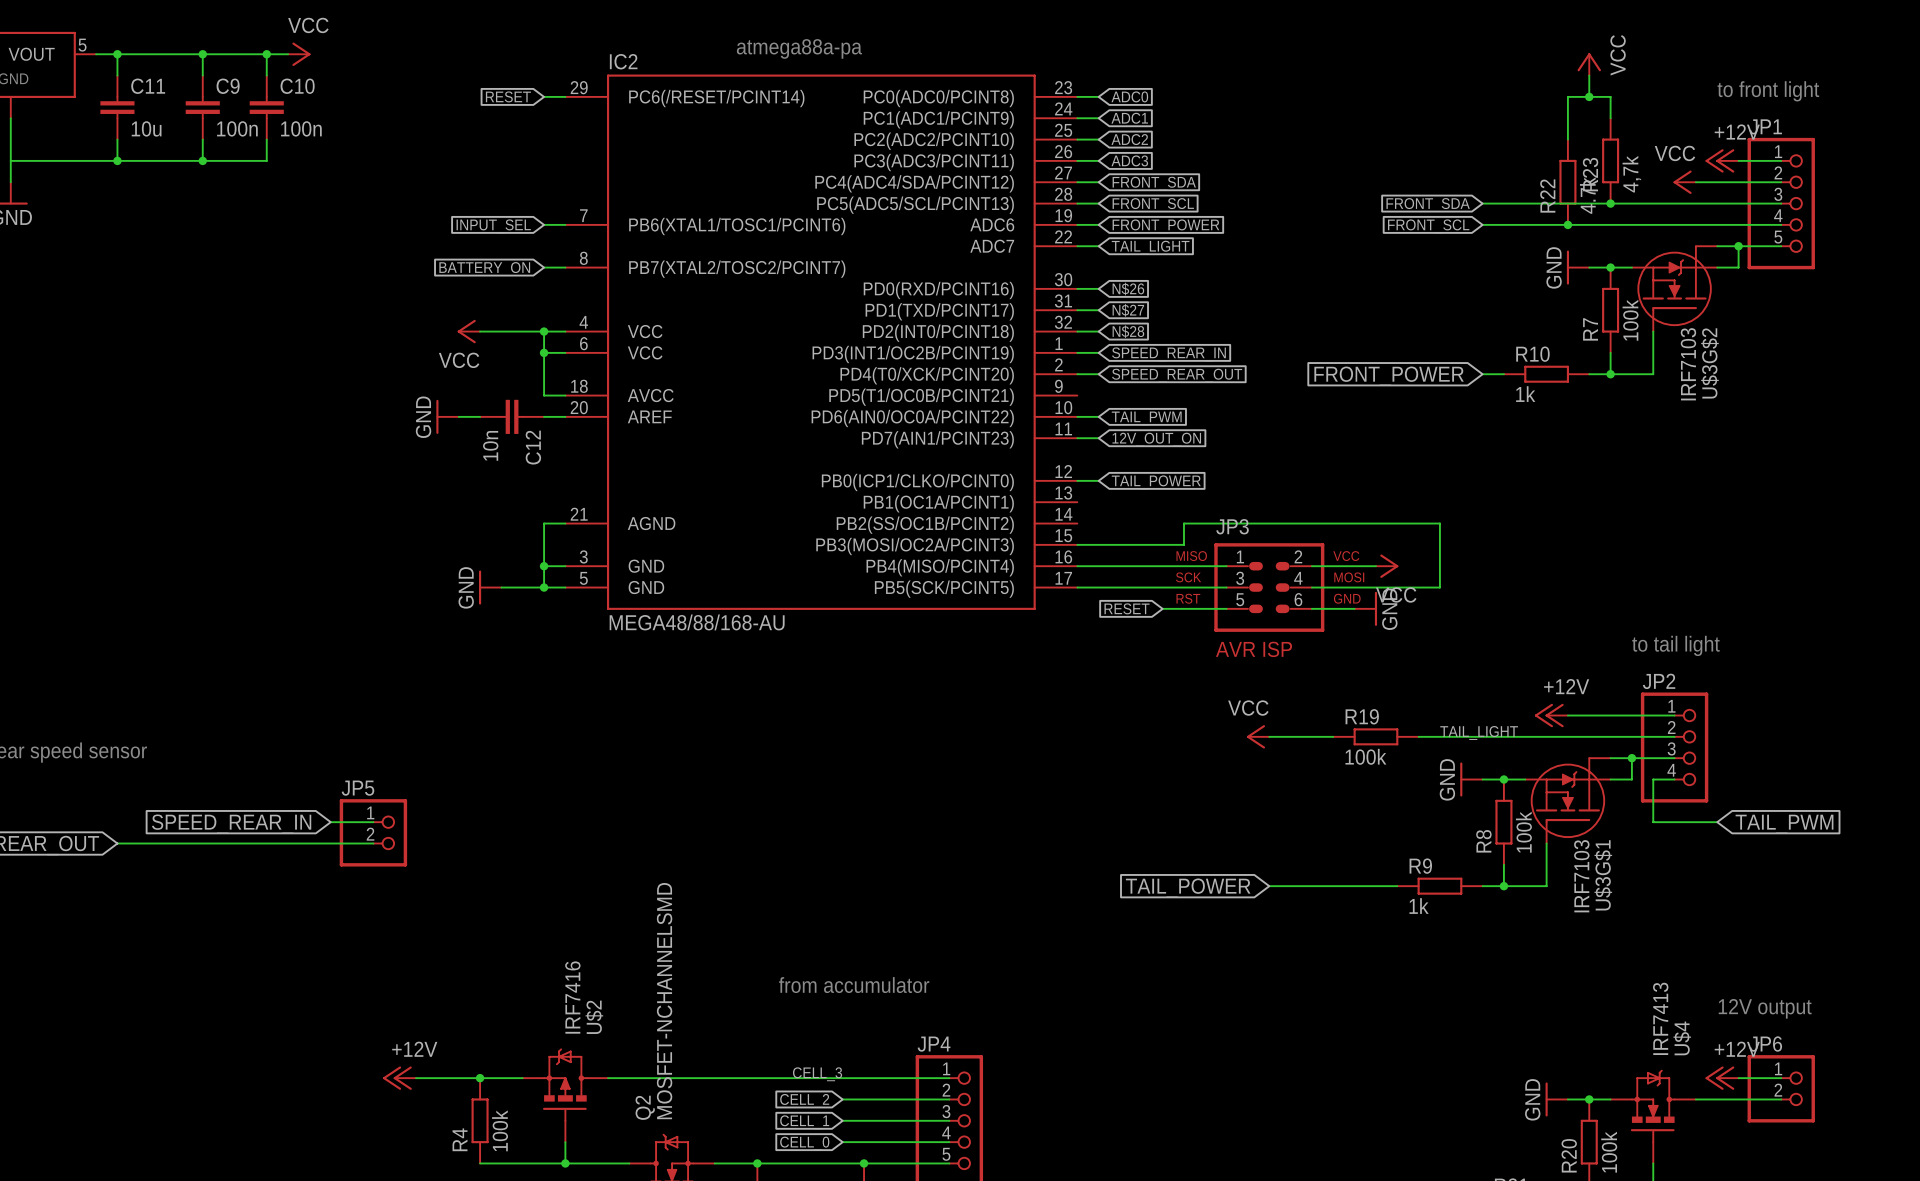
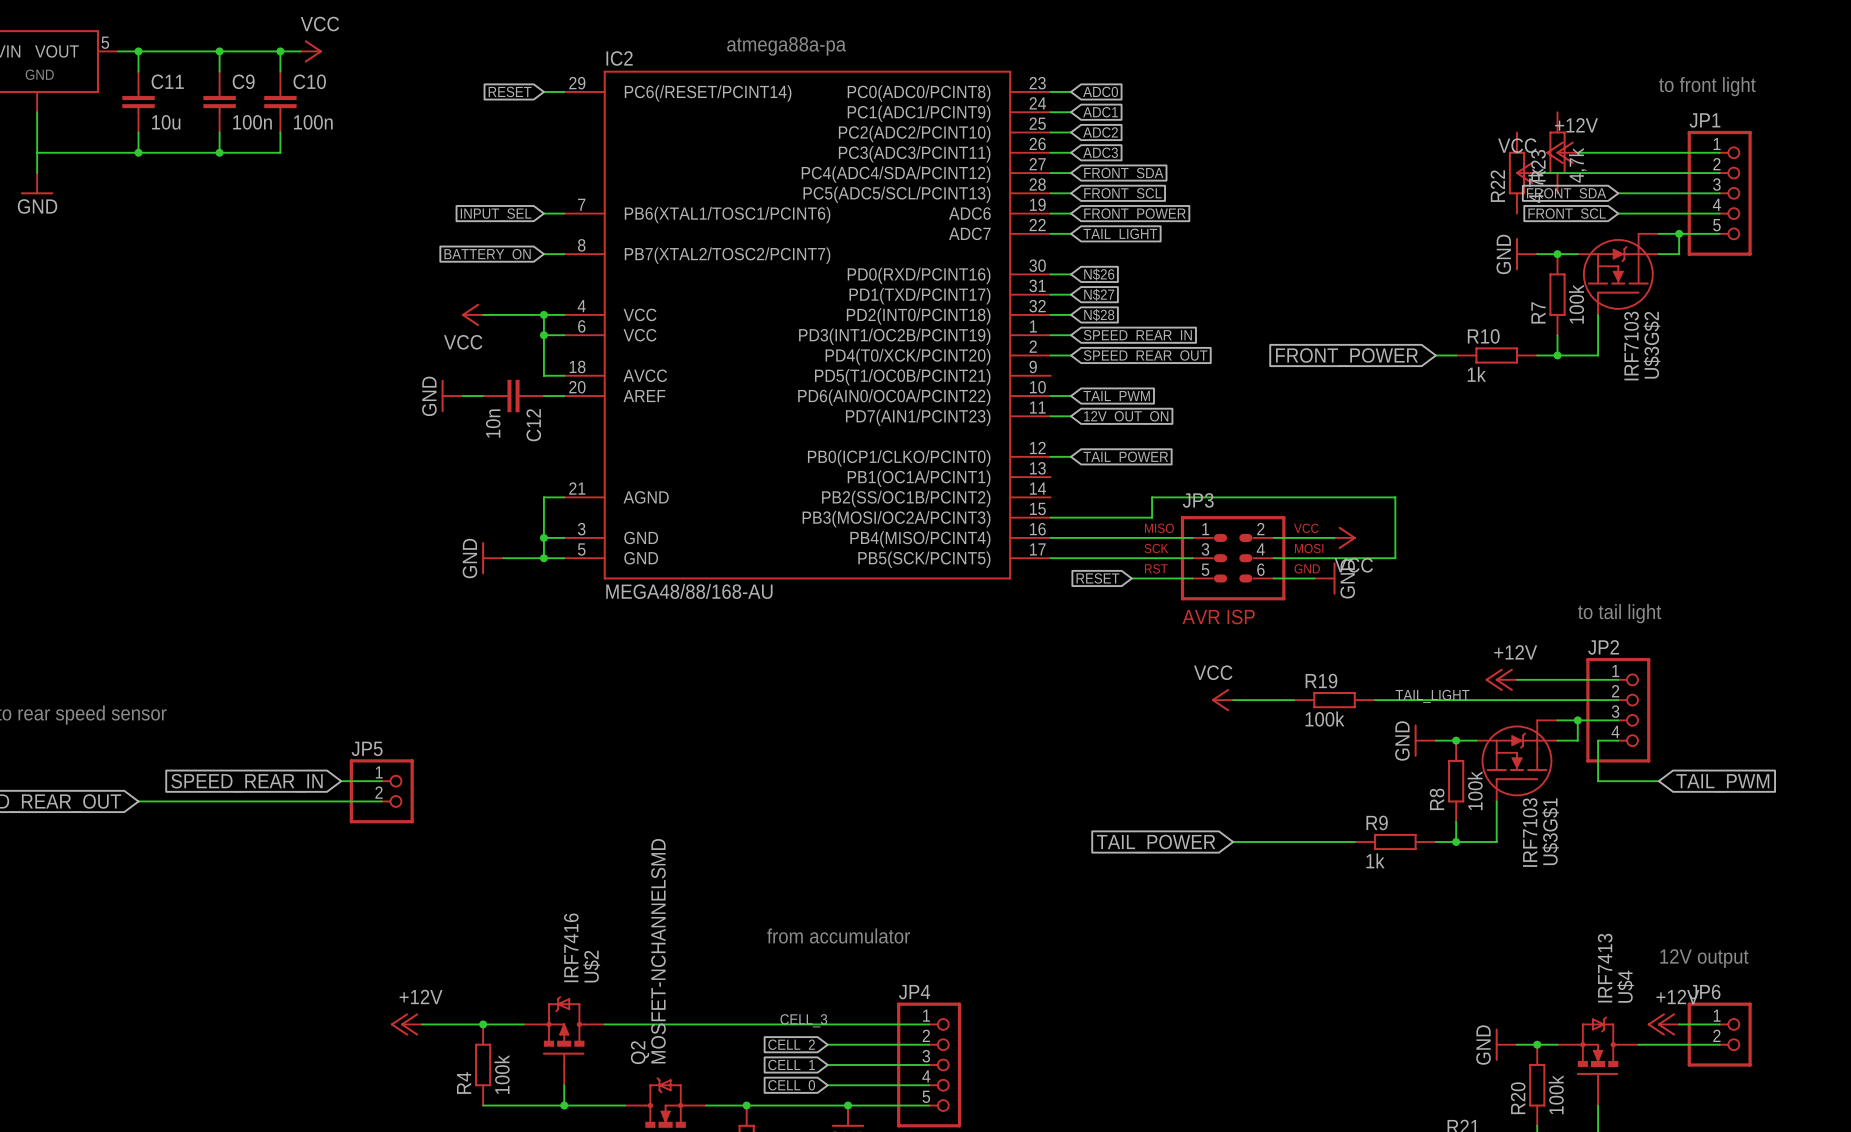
power symbol: VCC (1589, 64) -> none
wire: (1589, 75) (1589, 96) -> none
junction: (1589, 96) -> none
wire: (1610, 118) (1610, 96) (1567, 96) (1567, 139) -> none
wire: none -> (1577, 152) (1679, 152)
power symbol position: +12V (1722, 160) -> +12V (1562, 152)
power symbol: none -> VCC (1526, 173)
wire: none -> (1537, 173) (1638, 173)
power symbol: VCC (1684, 182) -> none
wire: (1482, 203) (1674, 203) -> none
junction: (1610, 203) -> none
global label position: FRONT_SDA (1428, 205) -> FRONT_SDA (1566, 194)
wire: (1482, 224) (1674, 224) -> none
junction: (1567, 224) -> none
global label position: FRONT_SCL (1428, 226) -> FRONT_SCL (1567, 214)

